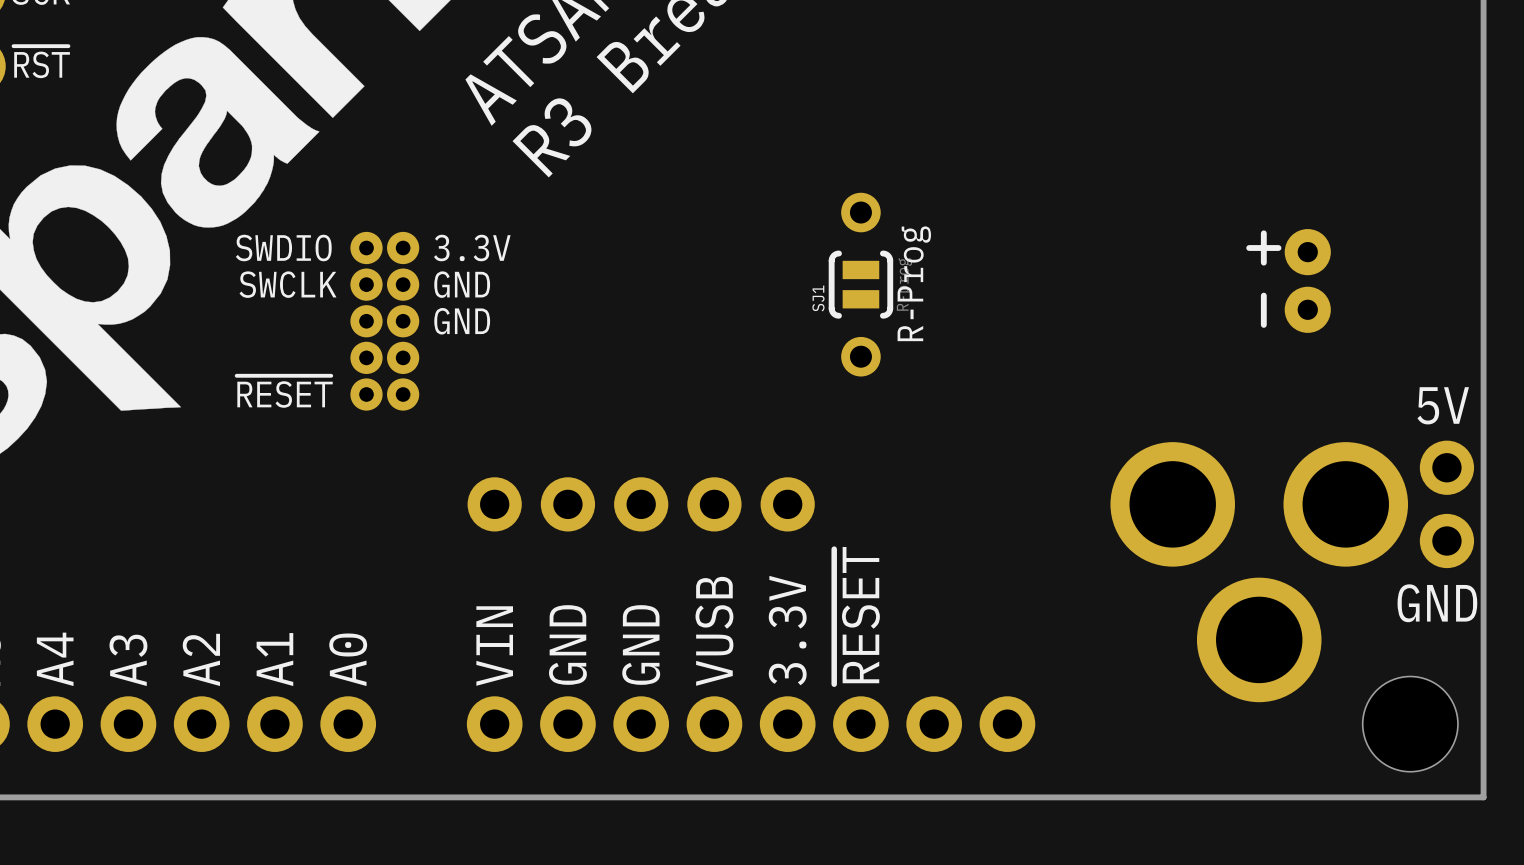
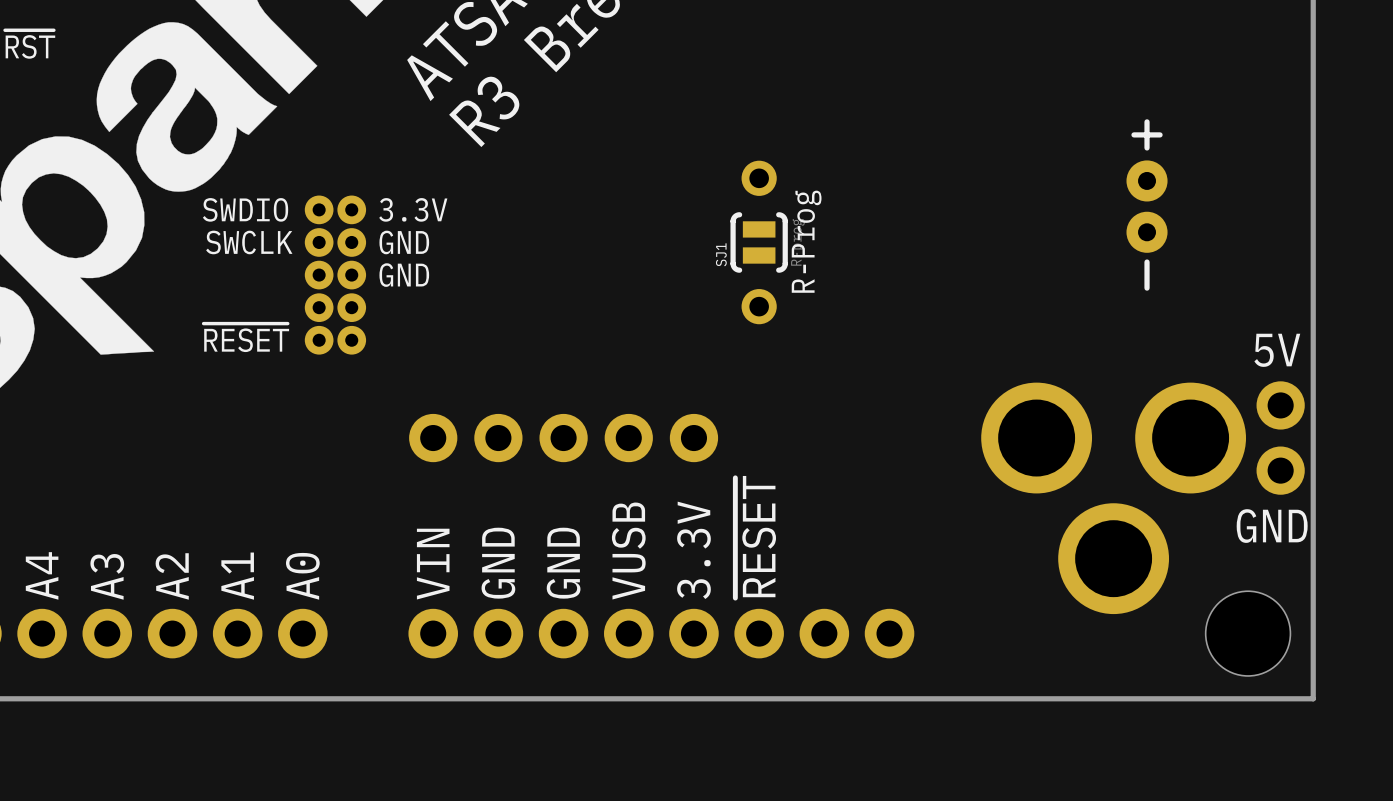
line: (1263, 233) (1263, 262) -> (1147, 121) (1147, 147)
line: (1278, 248) (1249, 248) -> (1160, 134) (1133, 134)
part position: (1307, 280) -> (1147, 206)
line: (1263, 295) (1263, 324) -> (1147, 262) (1147, 288)

